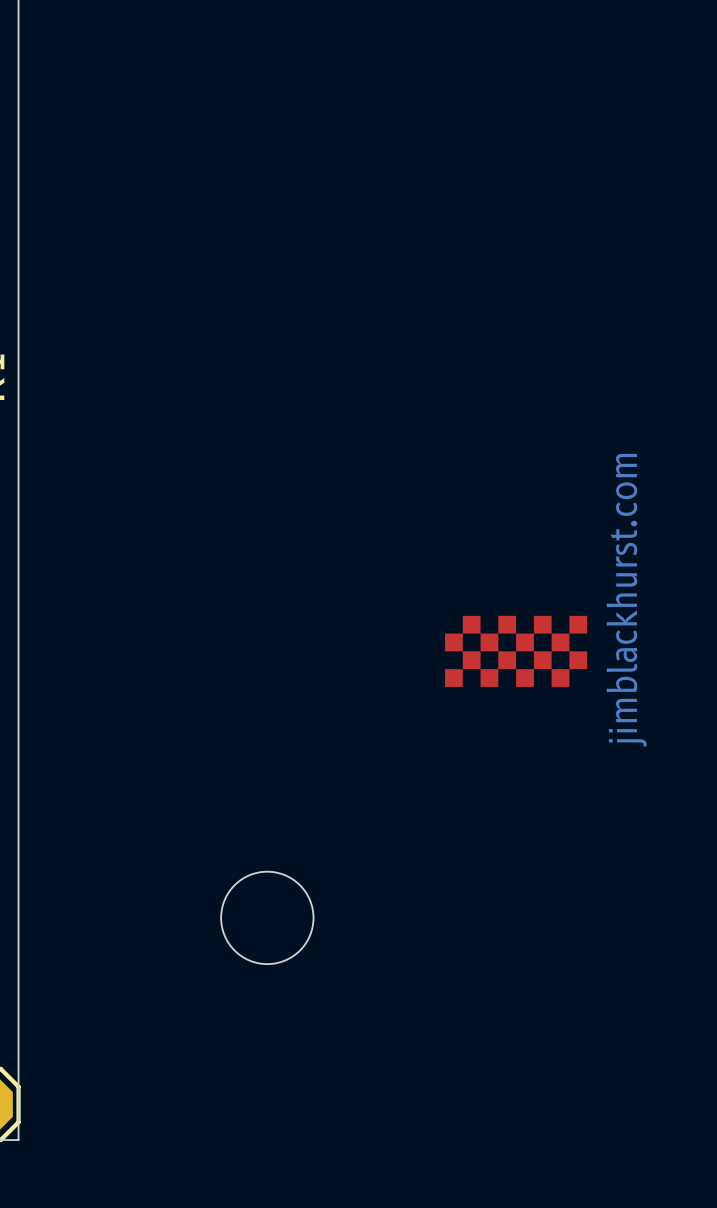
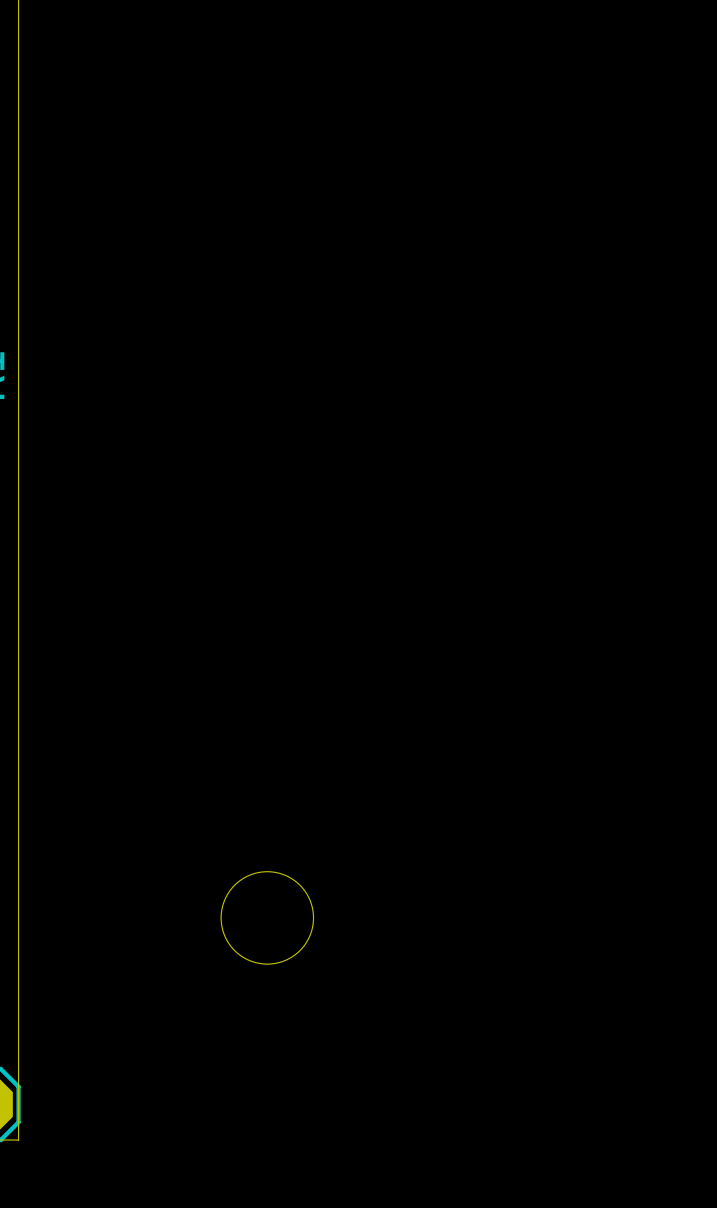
text: jimblackhurst.com (626, 600) -> none
drawing: [445, 615, 588, 687] -> none

